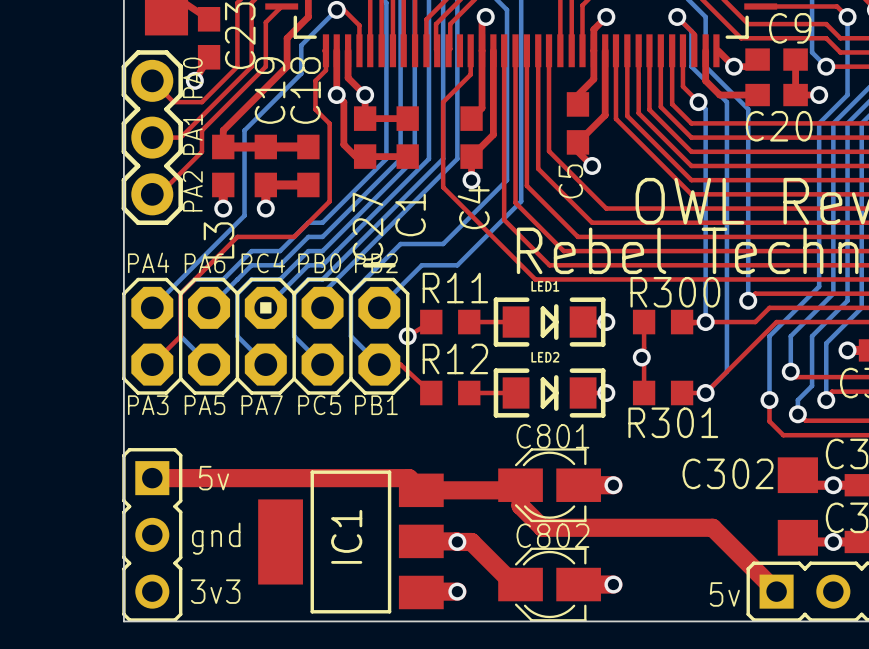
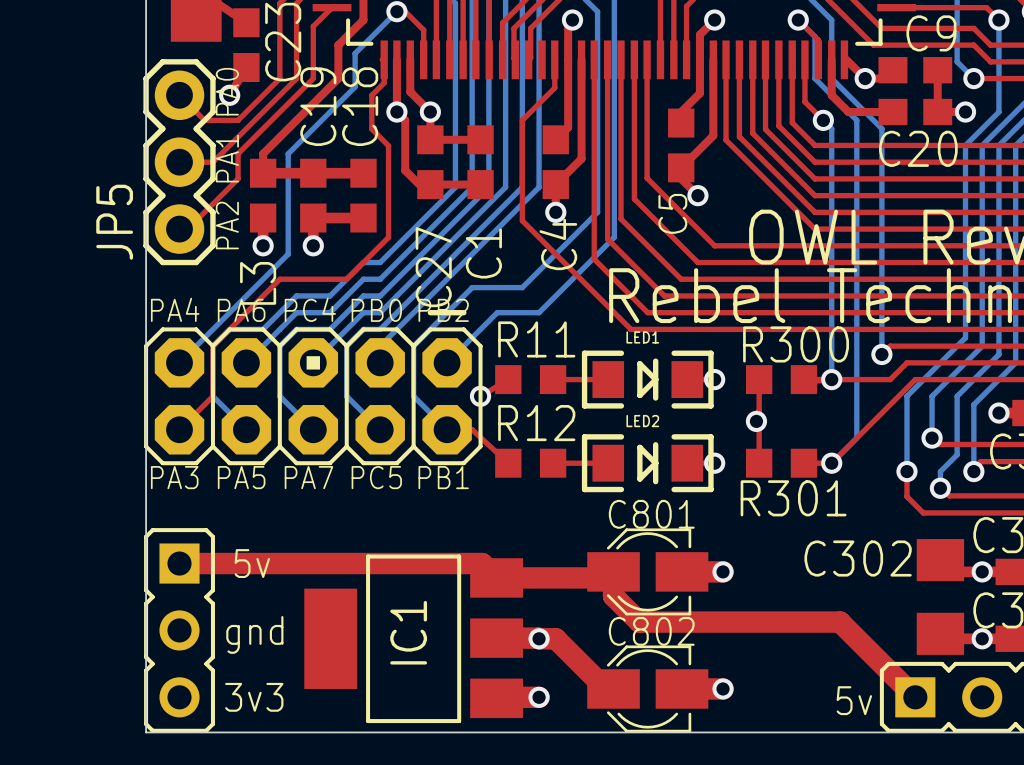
JP5 name: none -> JP5 (114, 222)

